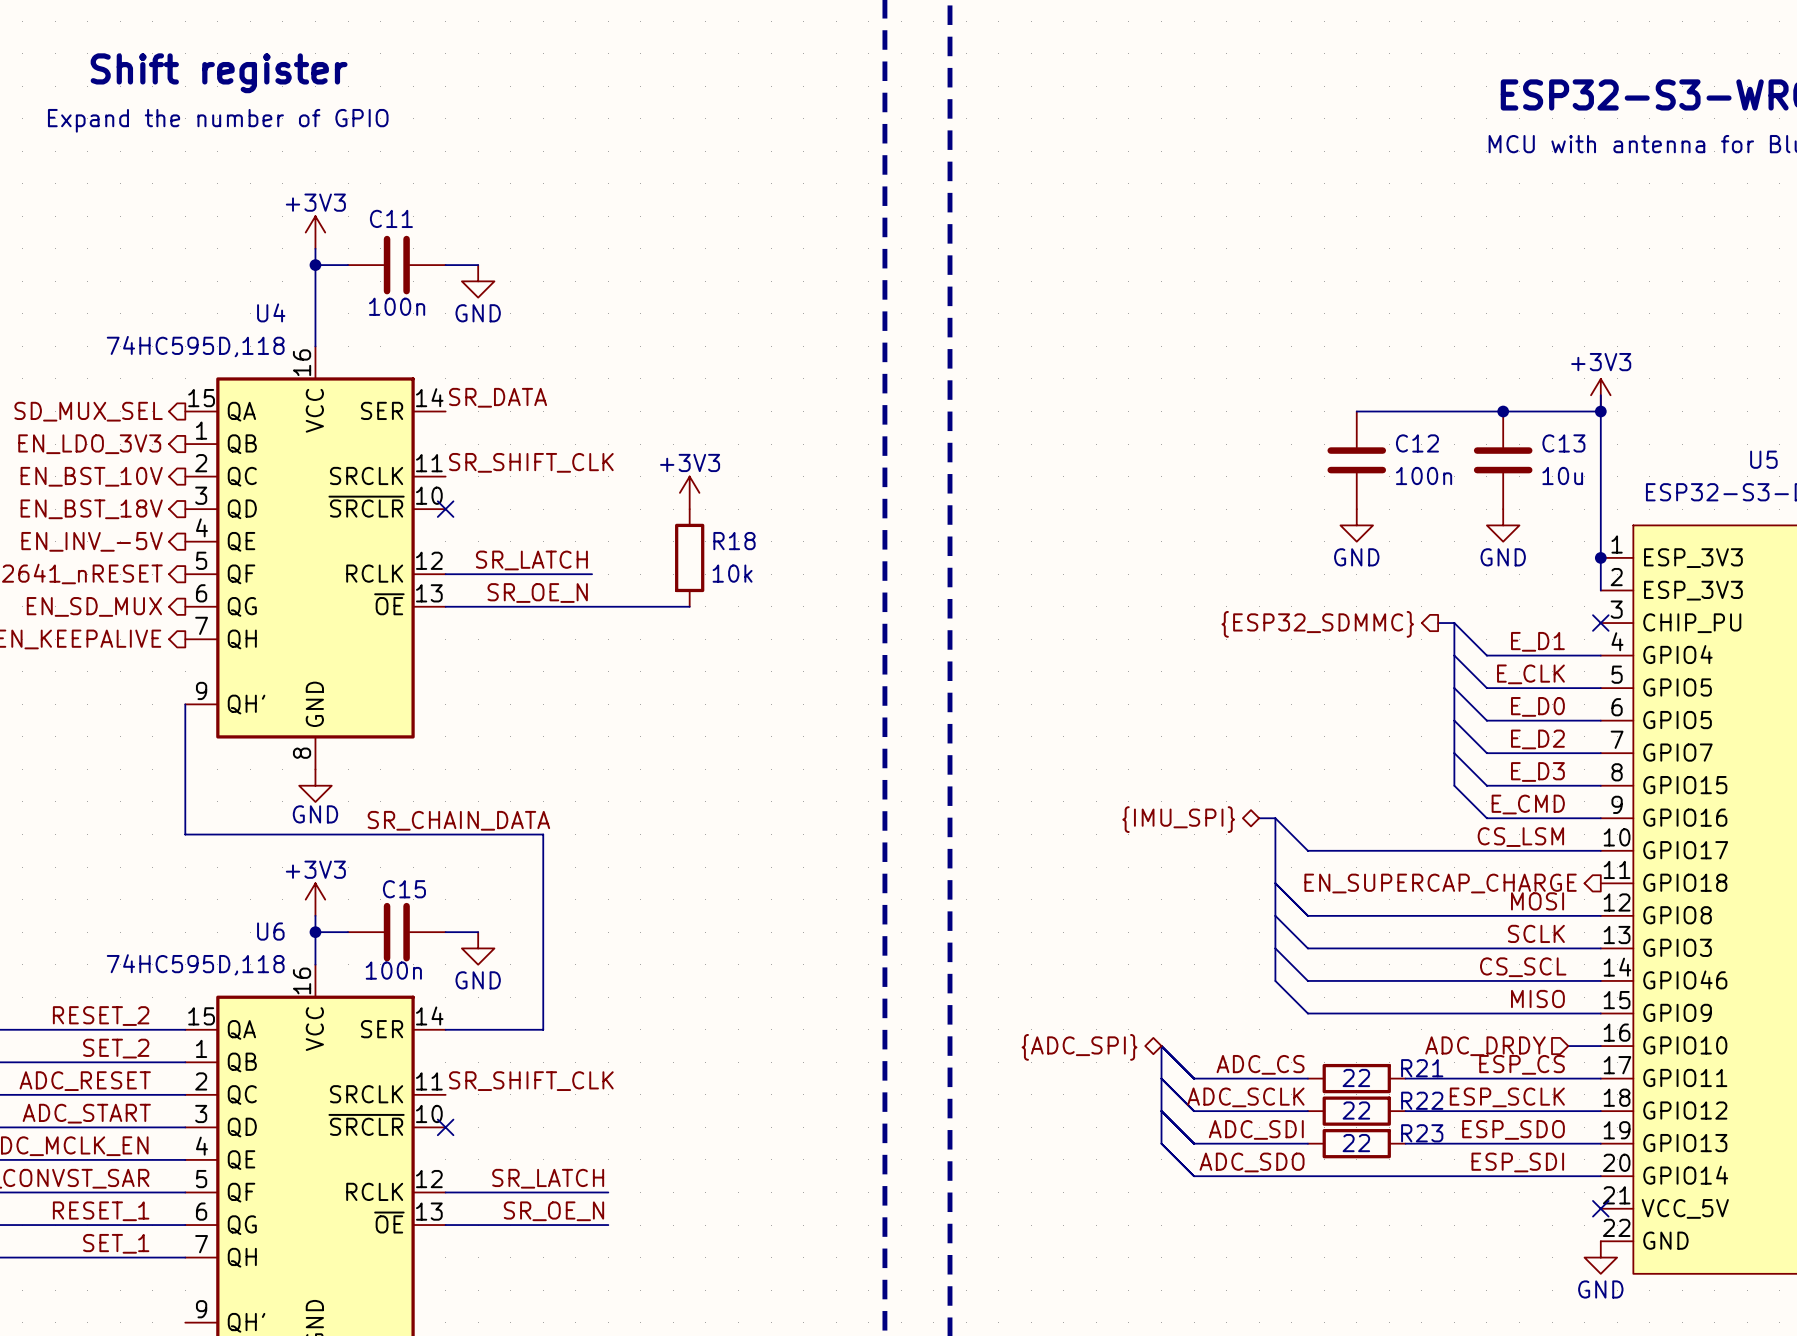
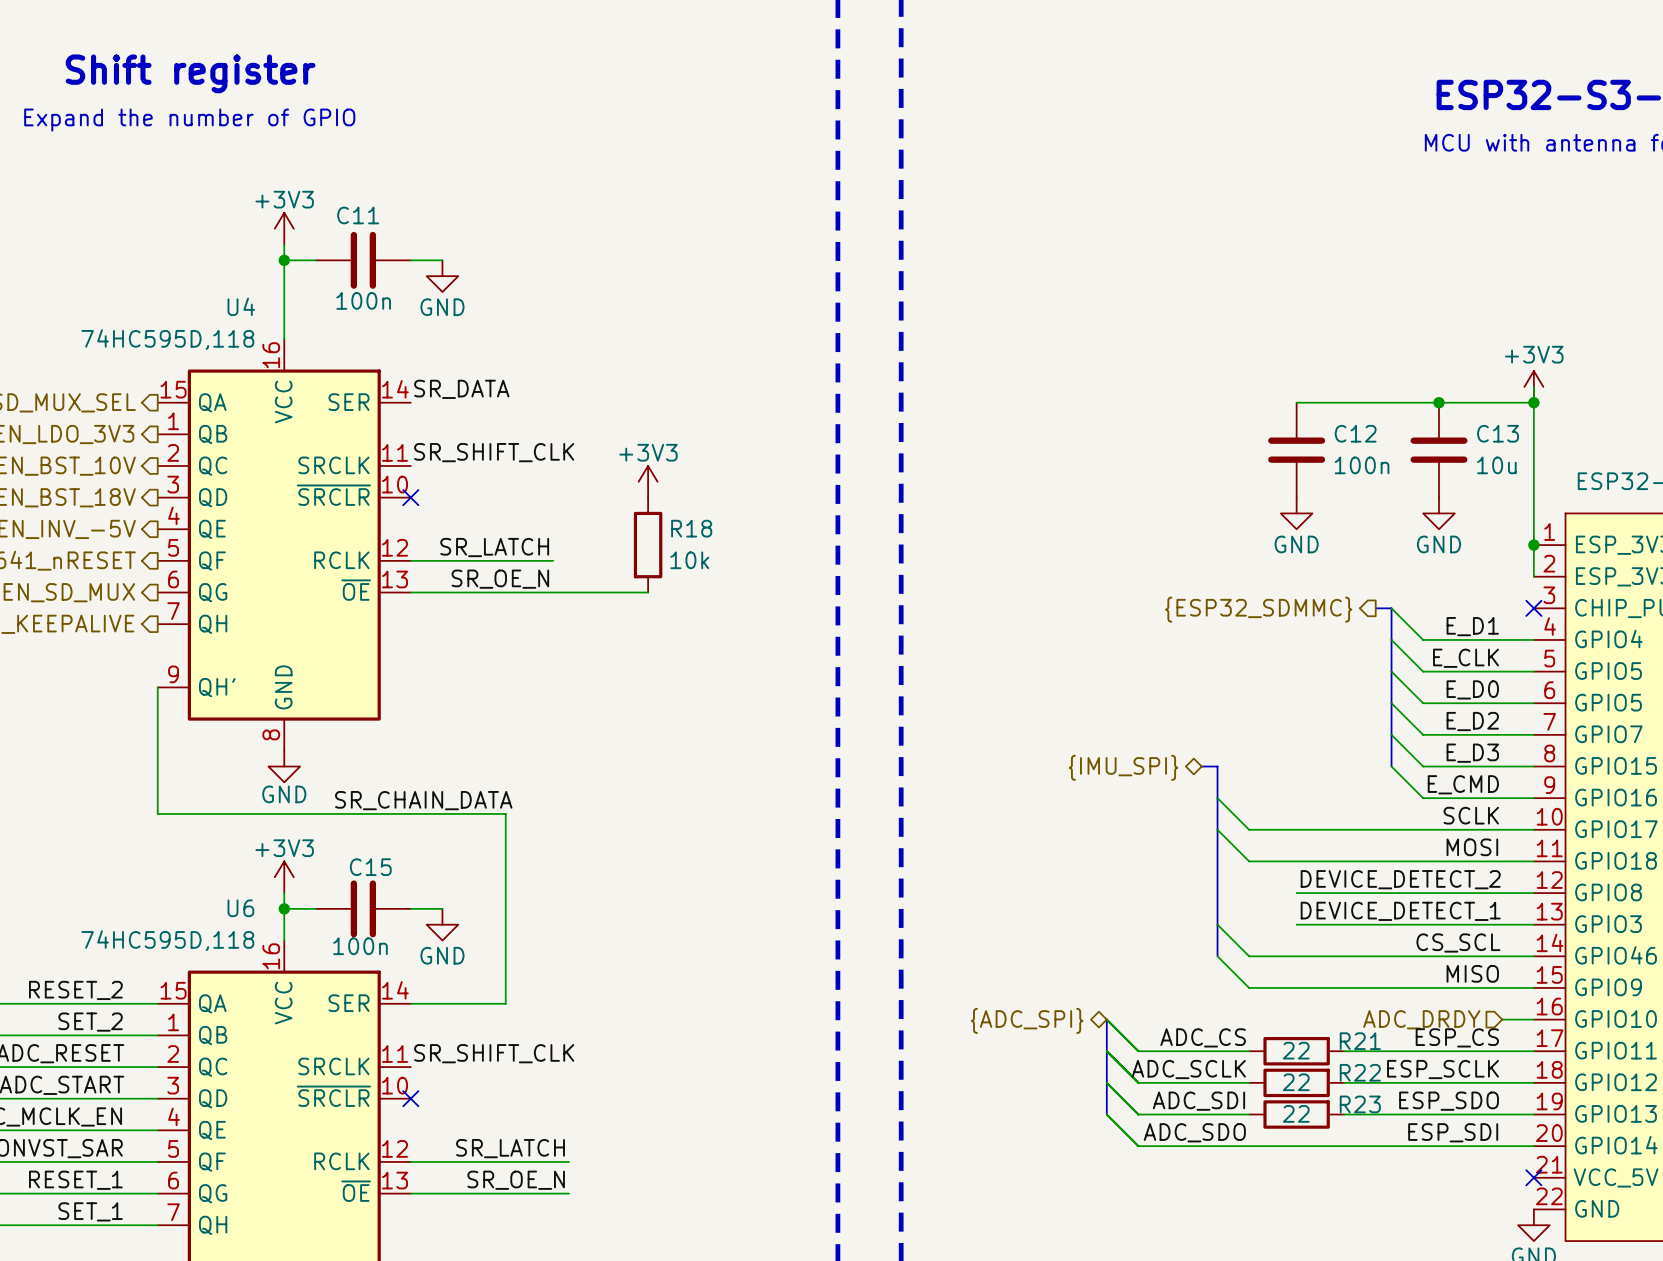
bus: (1259, 818) (1275, 818) -> (1201, 766) (1217, 766) (1217, 798)
hierarchical label position: {IMU_SPI} (1178, 819) -> {IMU_SPI} (1123, 767)
label: CS_LSM (1520, 837) -> SCLK (1471, 815)
wire: none -> (1217, 829) (1249, 861) (1533, 861)
wire: (1275, 883) (1307, 915) (1356, 915) -> none
hierarchical label: EN_SUPERCAP_CHARGE (1440, 883) -> none
label position: MOSI (1537, 901) -> MOSI (1472, 847)
label: none -> DEVICE_DETECT_2 (1400, 879)
wire: (1275, 915) (1307, 948) (1356, 948) -> none
label: SCLK (1536, 933) -> none
label: none -> DEVICE_DETECT_1 (1400, 911)

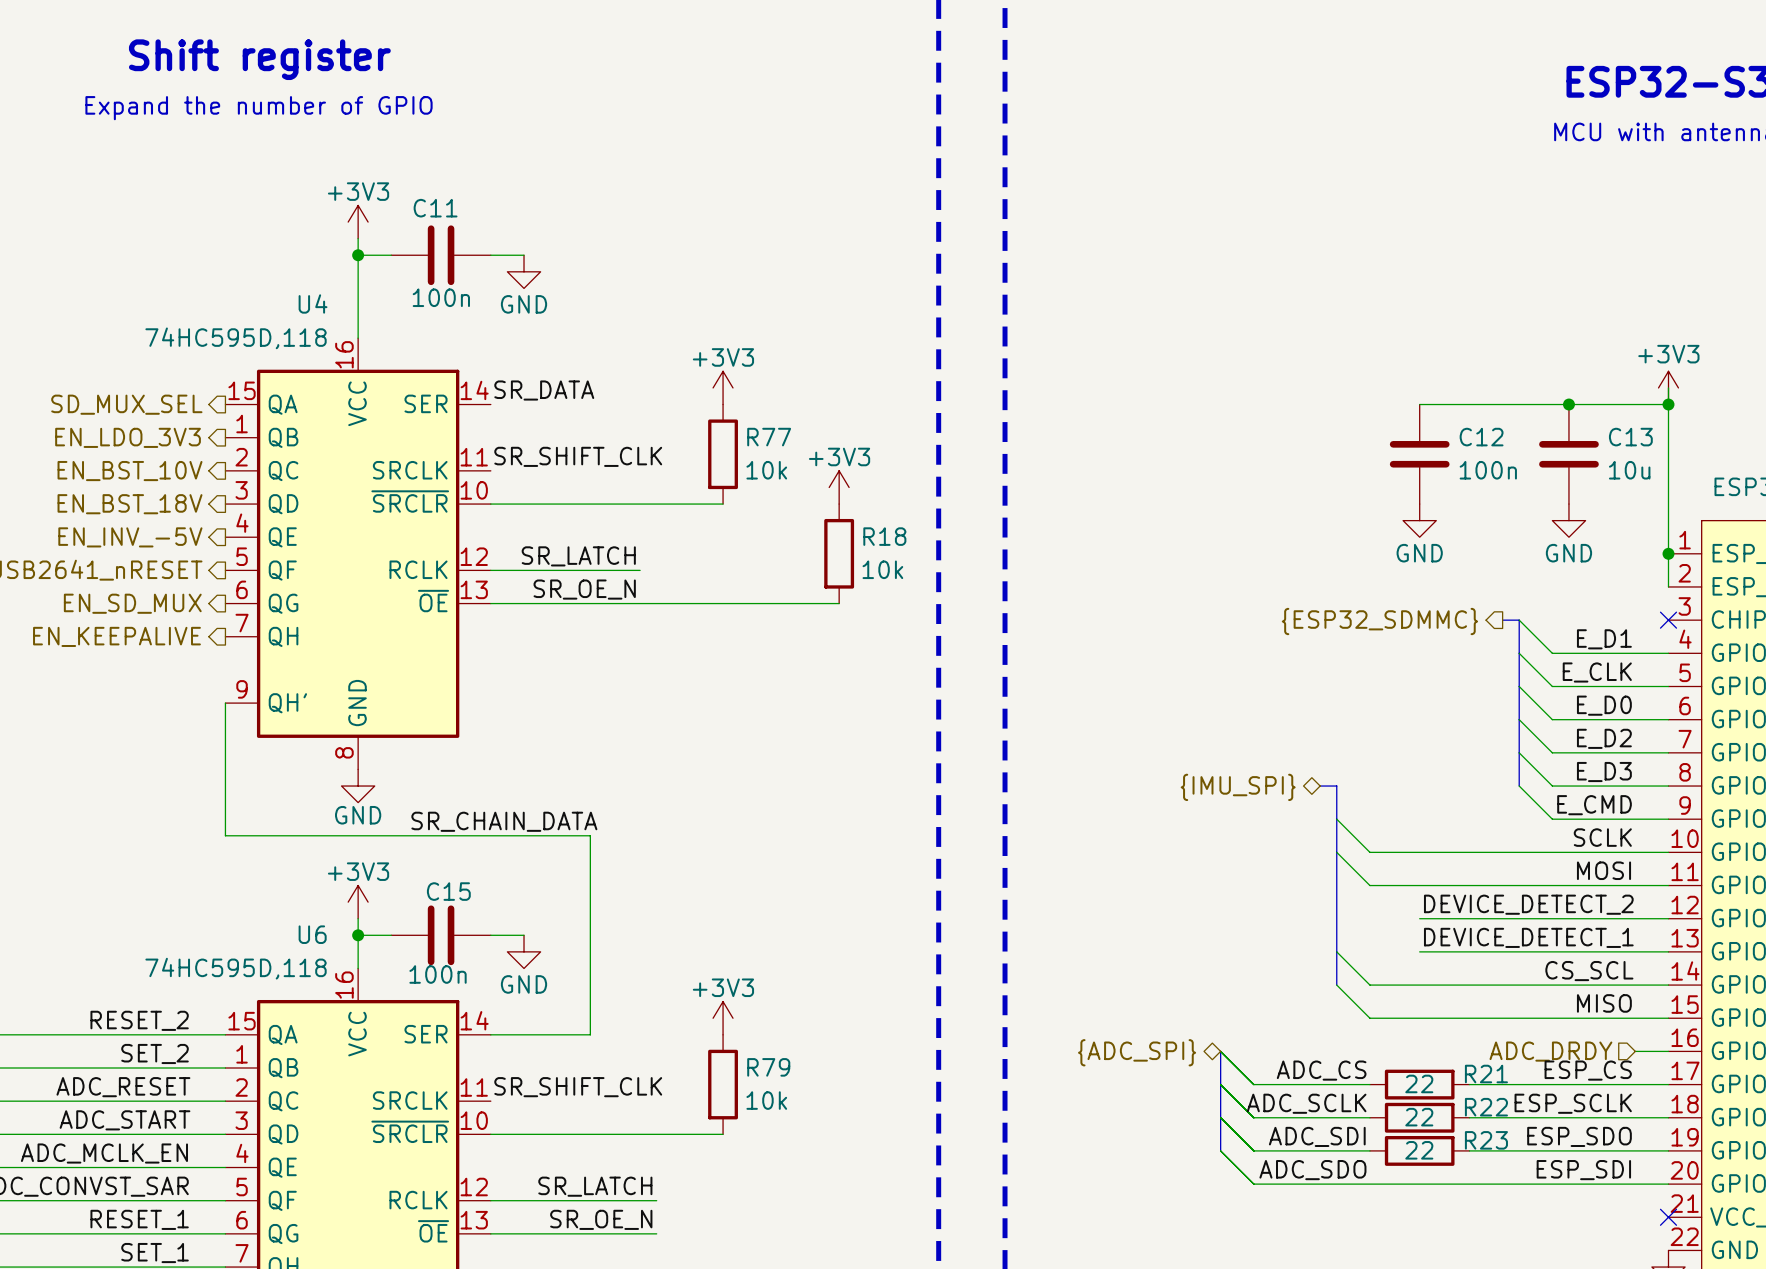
power symbol: none -> +3V3 (723, 387)
R77: none -> 10k (723, 454)
power symbol: +3V3 (648, 481) -> none
power symbol: none -> +3V3 (839, 487)
wire: none -> (490, 504) (723, 504)
no-connect mark: (410, 497) -> none
R18 position: (648, 545) -> (839, 553)
wire: none -> (739, 603) (839, 603)
power symbol: none -> +3V3 (723, 1018)
R79: none -> 10k (723, 1084)
wire: none -> (490, 1134) (723, 1134)
no-connect mark: (410, 1098) -> none

